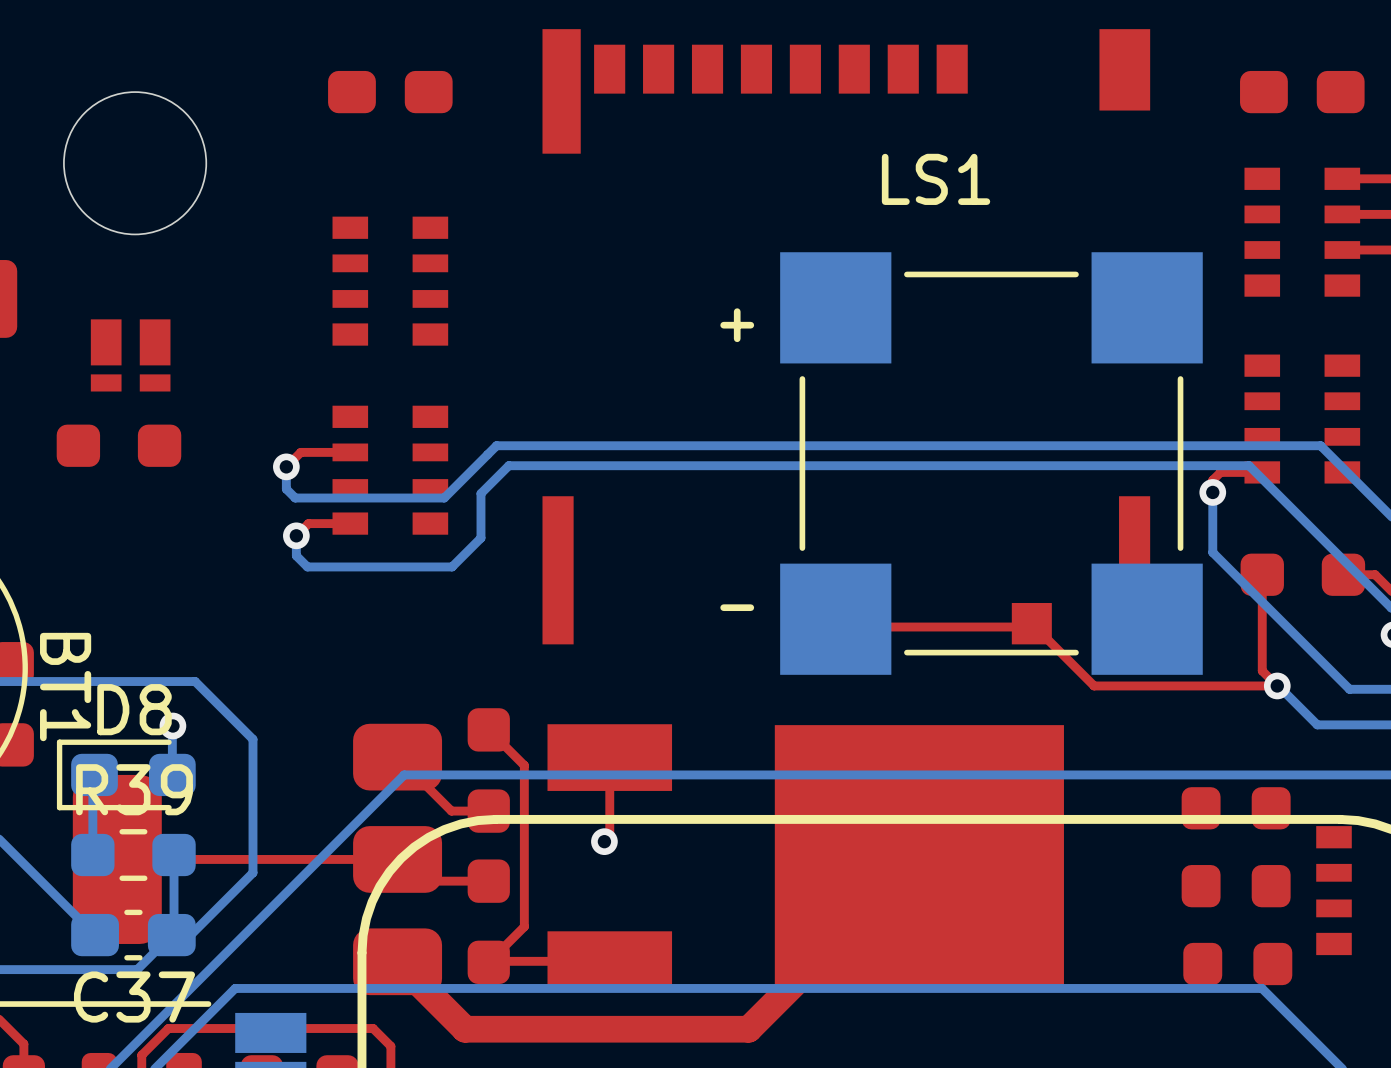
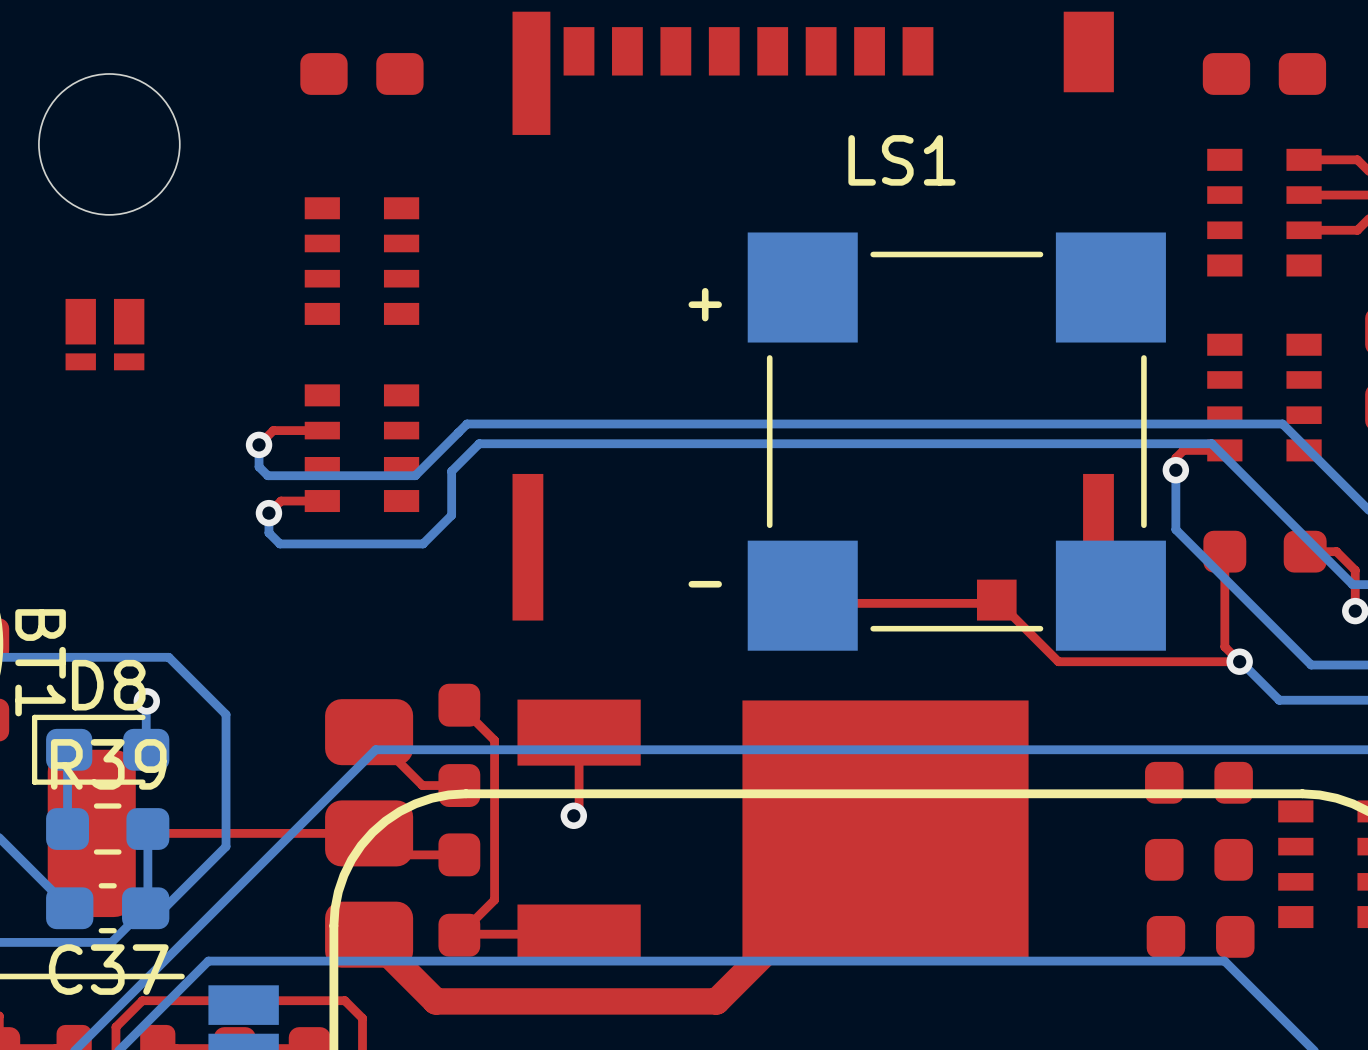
part: (118, 445) -> none

